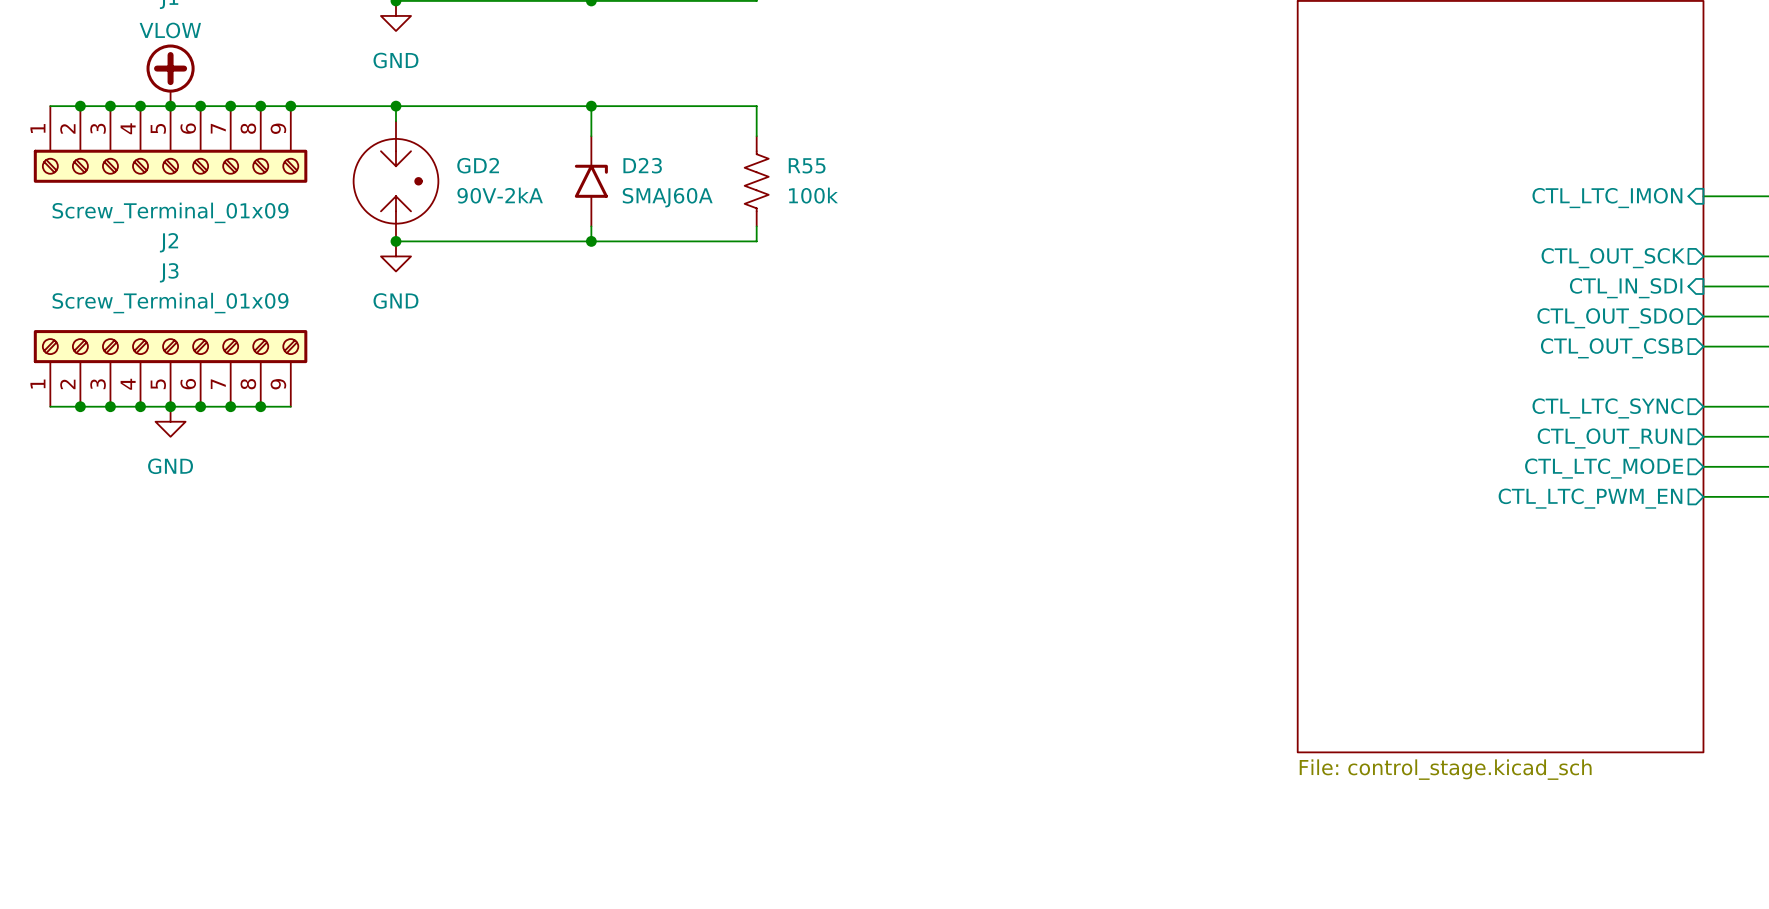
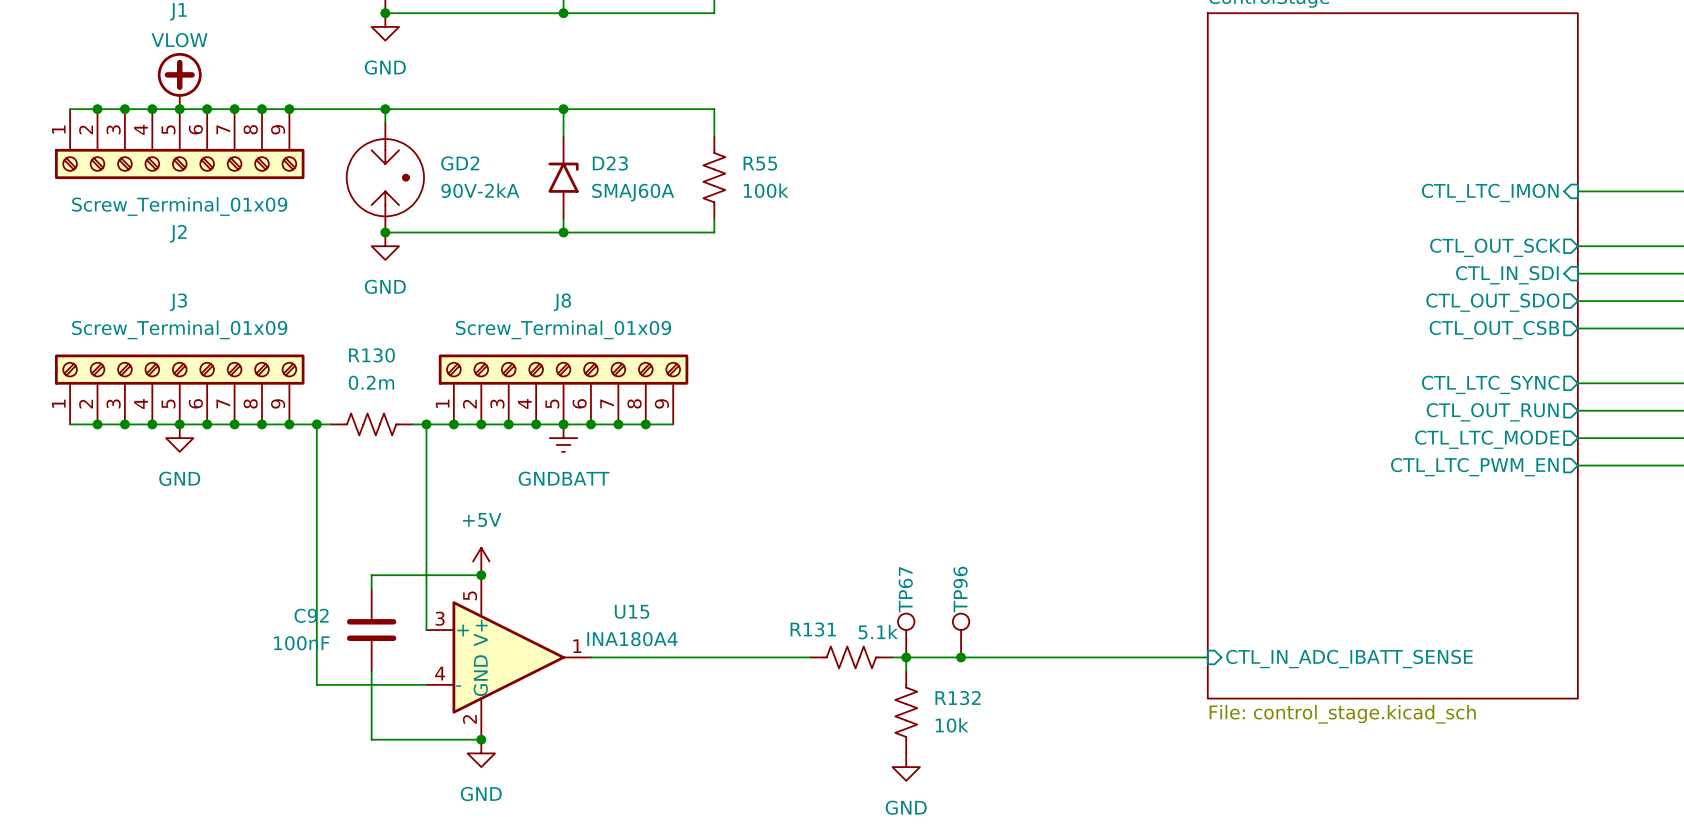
J3 position: (170, 368) -> (179, 389)
junction: (80, 406) -> none
junction: (110, 406) -> none
junction: (140, 406) -> none
junction: (170, 406) -> none
junction: (200, 406) -> none
junction: (230, 406) -> none
junction: (260, 406) -> none
J8: none -> Screw_Terminal_01x09 (563, 389)
power symbol position: GND (170, 421) -> GND (179, 438)
wire: none -> (70, 424) (330, 424)
junction: none -> (97, 424)
junction: none -> (124, 424)
junction: none -> (152, 424)
junction: none -> (179, 424)
junction: none -> (207, 424)
junction: none -> (234, 424)
junction: none -> (261, 424)
junction: none -> (289, 424)
wire: none -> (316, 424) (316, 684) (426, 684)
junction: none -> (316, 424)
R130: none -> 0.2m (371, 424)
wire: none -> (412, 424) (673, 424)
wire: none -> (426, 424) (426, 630)
junction: none -> (426, 424)
junction: none -> (453, 424)
junction: none -> (481, 424)
junction: none -> (508, 424)
junction: none -> (536, 424)
junction: none -> (563, 424)
junction: none -> (590, 424)
junction: none -> (618, 424)
junction: none -> (645, 424)
power symbol: none -> GNDBATT (563, 438)
power symbol: none -> +5V (481, 561)
wire: none -> (481, 575) (371, 575) (371, 588)
junction: none -> (481, 575)
C92: none -> 100nF (371, 630)
TP67: none -> (906, 635)
TP96: none -> (961, 635)
U15: none -> INA180A4 (508, 657)
wire: none -> (590, 657) (810, 657)
R131: none -> 5.1k (851, 657)
wire: none -> (892, 657) (1207, 657)
wire: none -> (906, 657) (906, 671)
junction: none -> (906, 657)
junction: none -> (961, 657)
sheet pin: none -> CTL_IN_ADC_IBATT_SENSE (1349, 659)
wire: none -> (371, 671) (371, 739) (481, 739)
R132: none -> 10k (906, 712)
junction: none -> (481, 739)
power symbol: none -> GND (481, 753)
power symbol: none -> GND (906, 767)

